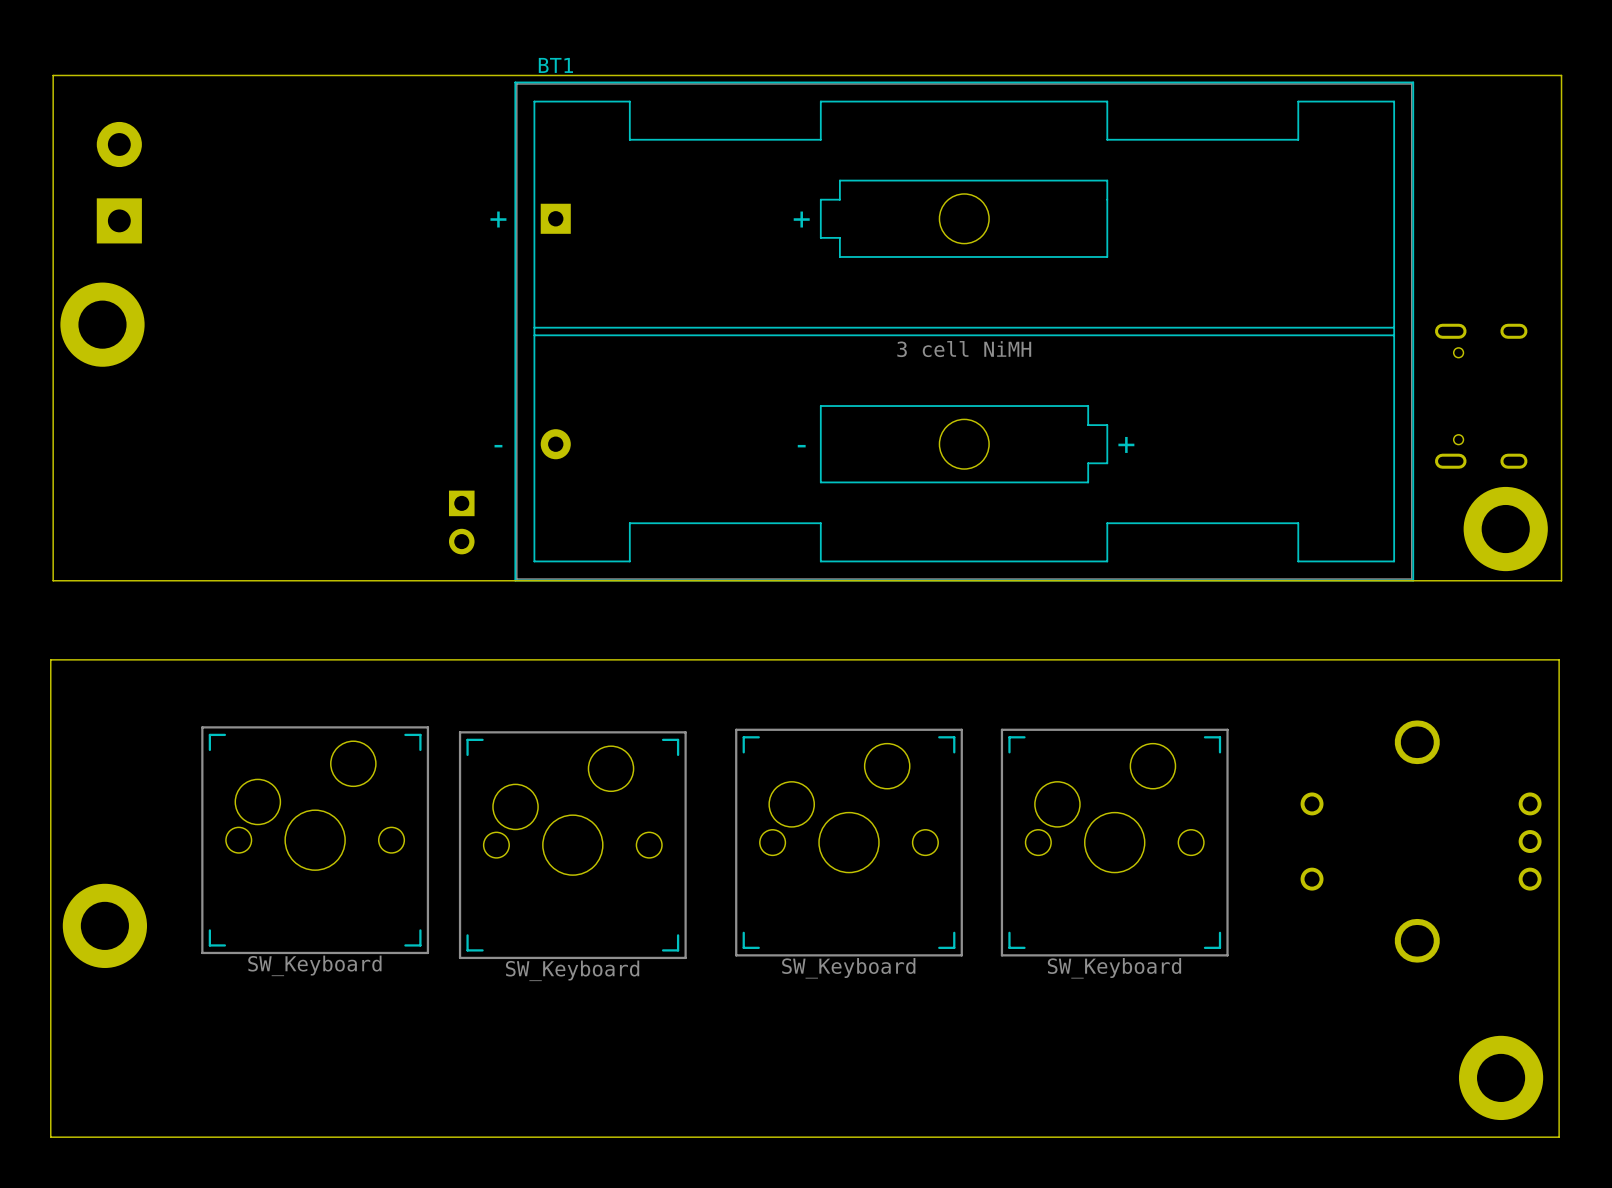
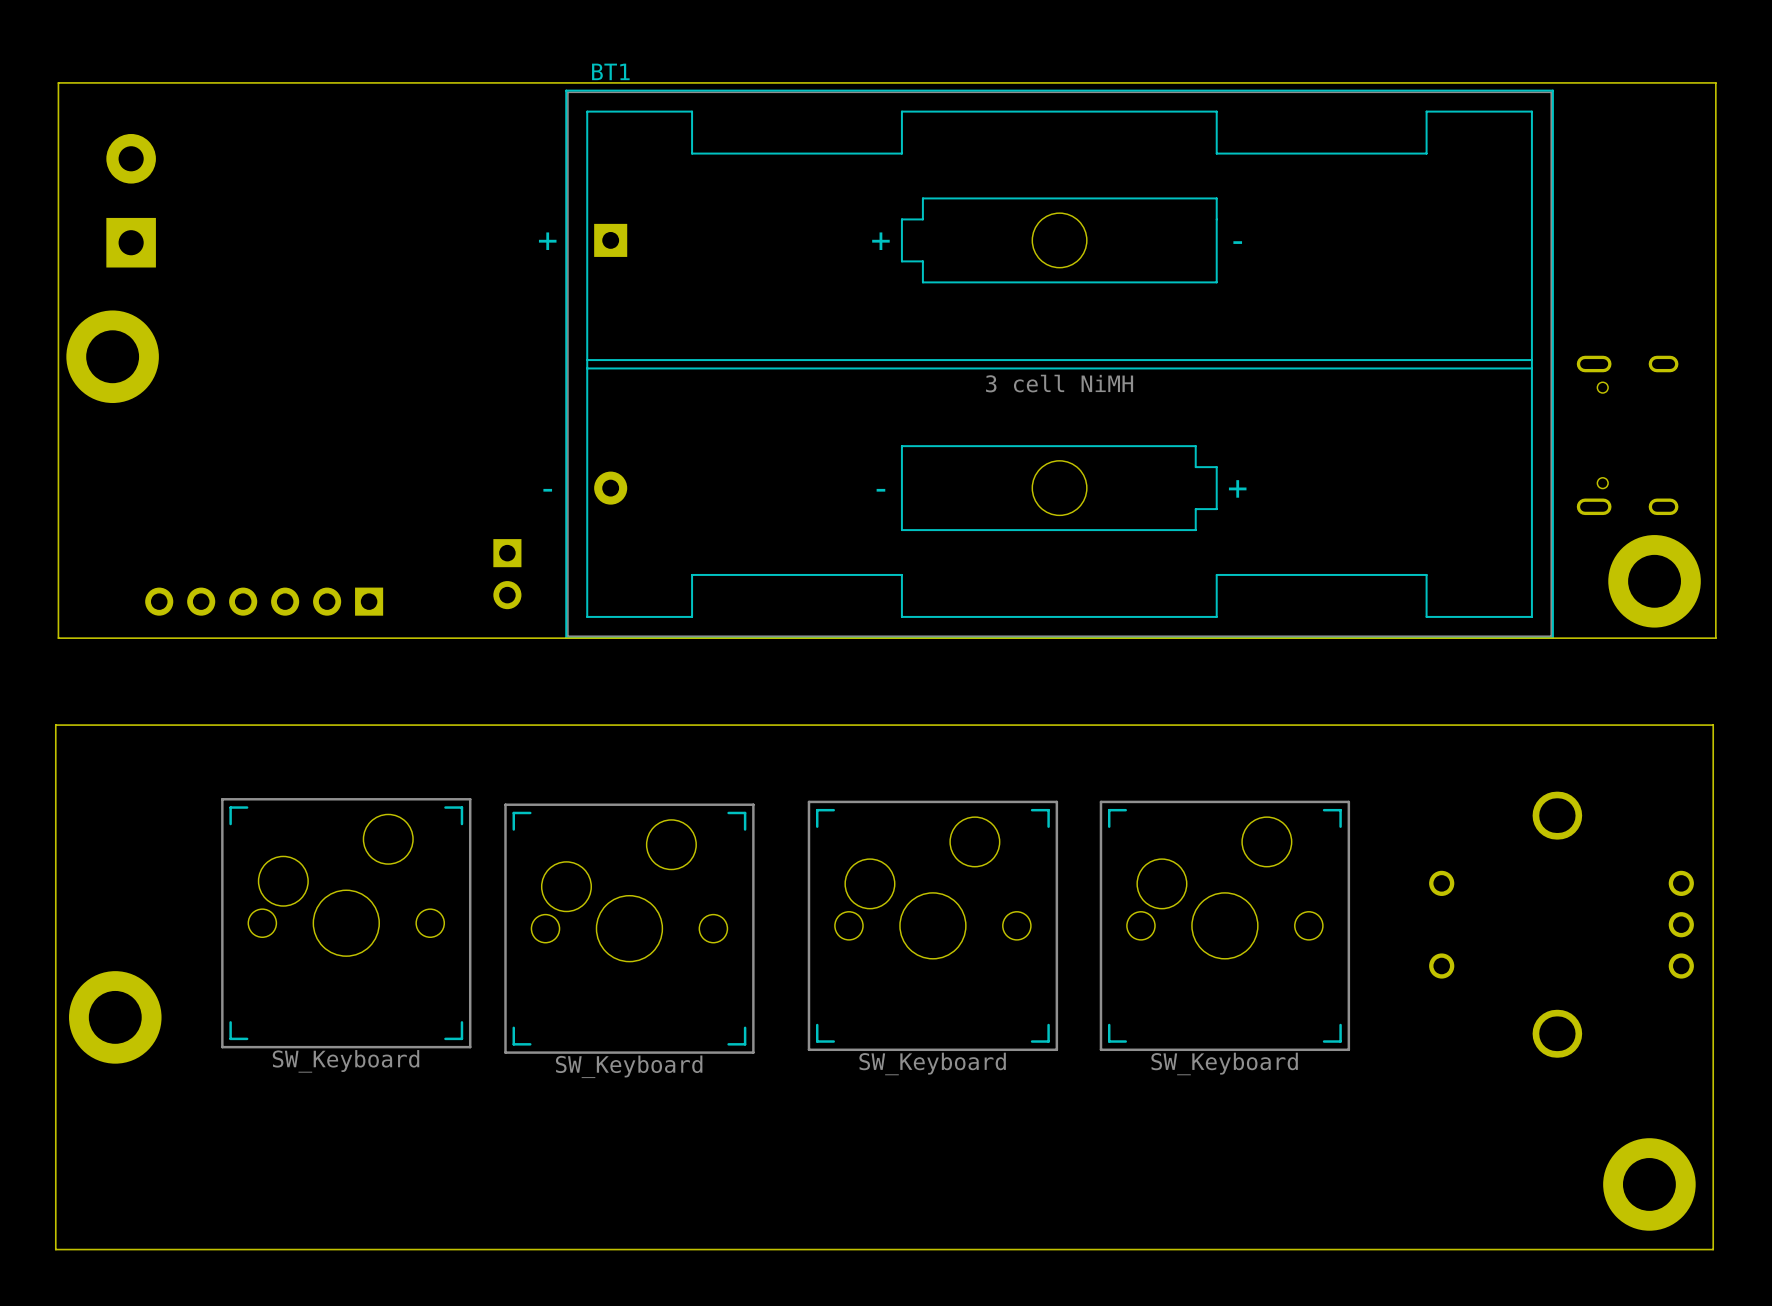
BT1 text: none -> - (1237, 242)
part: none -> (264, 601)

